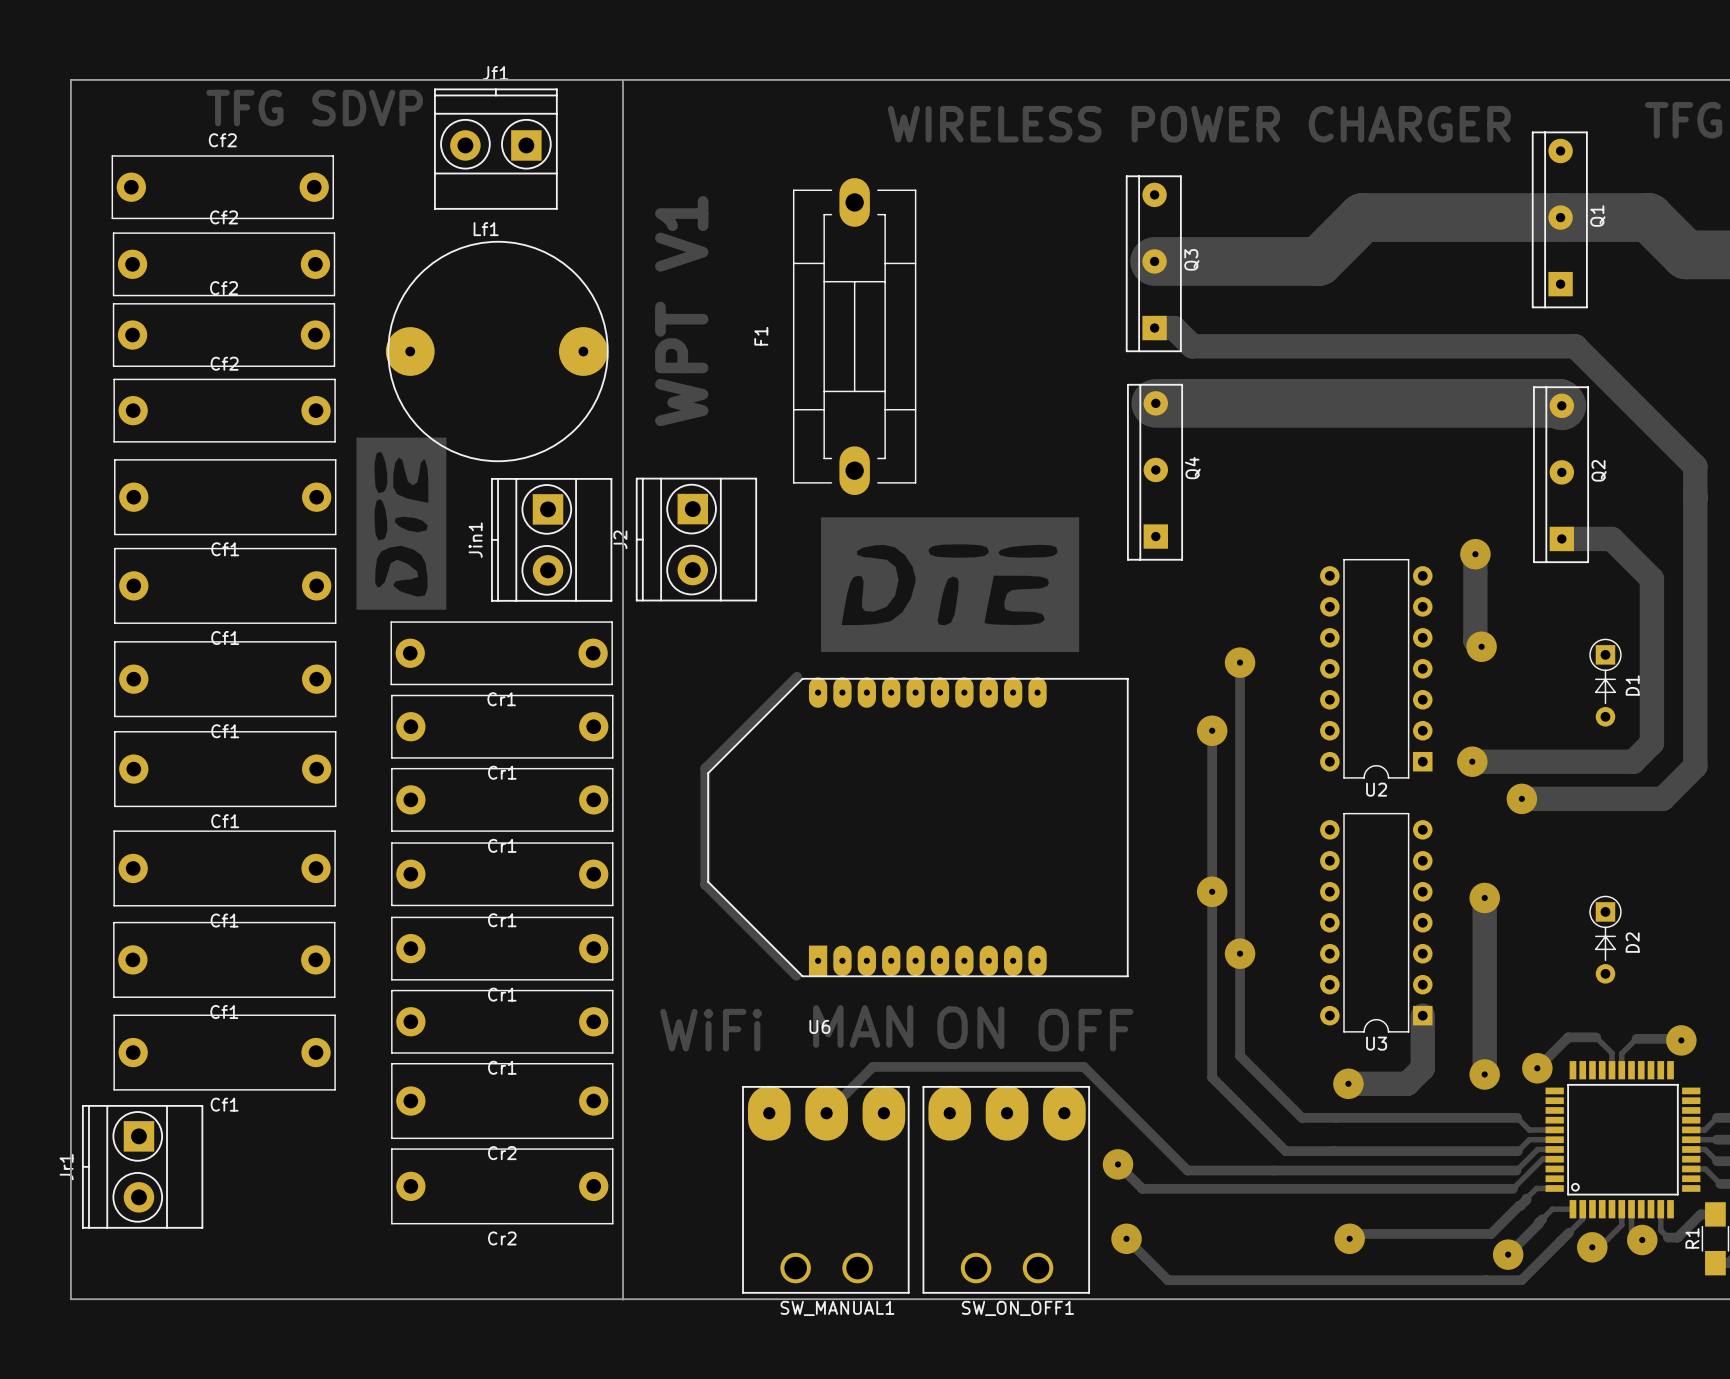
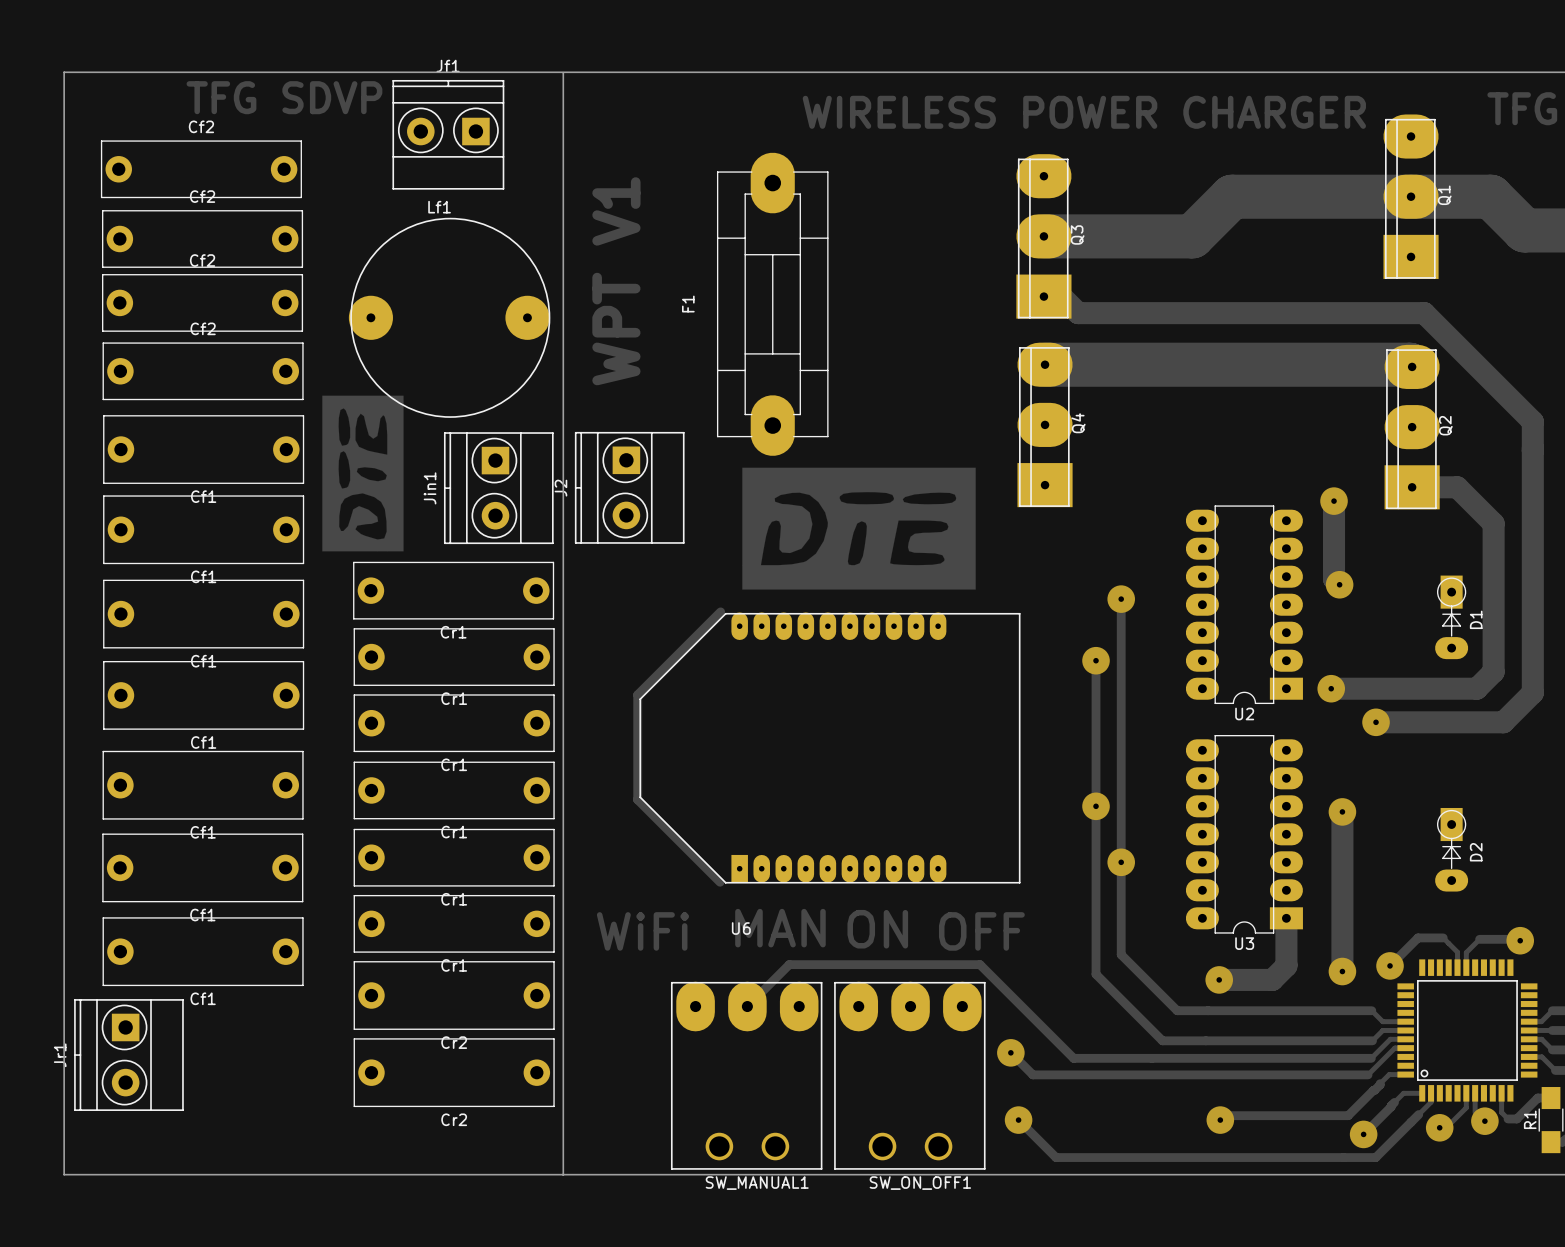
Q1 footprint: [1531, 131, 1588, 309] -> [1383, 114, 1439, 279]
Q3 footprint: [1125, 175, 1182, 353] -> [1016, 154, 1072, 319]
F1 footprint: [792, 178, 917, 496] -> [716, 152, 829, 456]
Q4 footprint: [1127, 383, 1184, 561] -> [1017, 342, 1073, 508]
Q2 footprint: [1533, 386, 1590, 564] -> [1384, 344, 1440, 510]
U2 footprint: [1320, 558, 1433, 779] -> [1185, 505, 1303, 705]
D1 footprint: [1589, 638, 1622, 727] -> [1435, 575, 1469, 660]
U3 footprint: [1320, 812, 1433, 1033] -> [1185, 734, 1303, 934]
D2 footprint: [1589, 895, 1622, 984] -> [1435, 807, 1469, 892]

